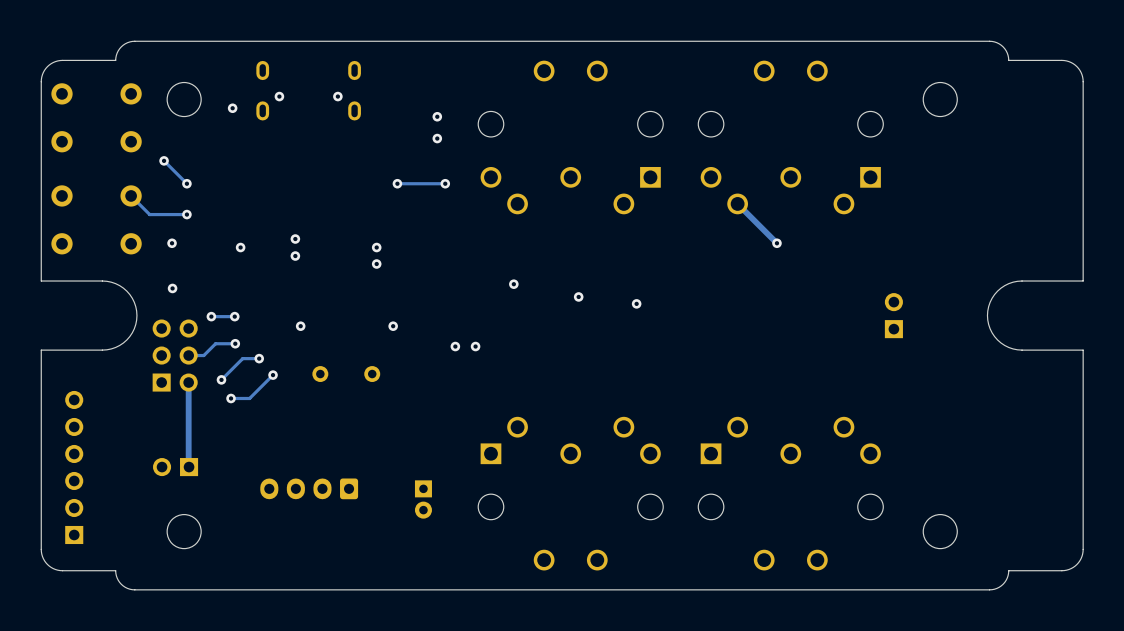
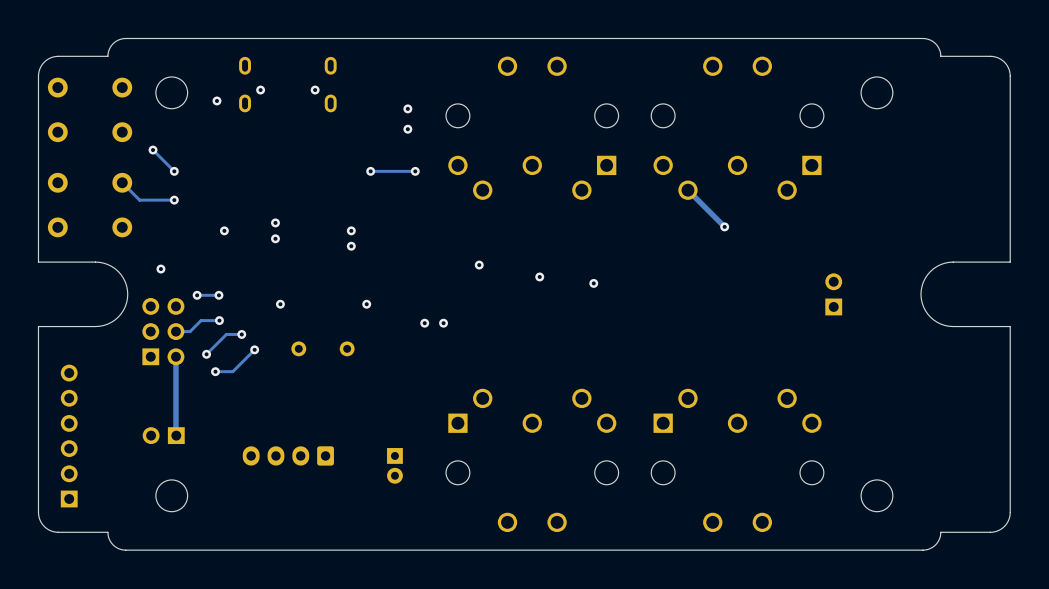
via: (172, 243) -> none

